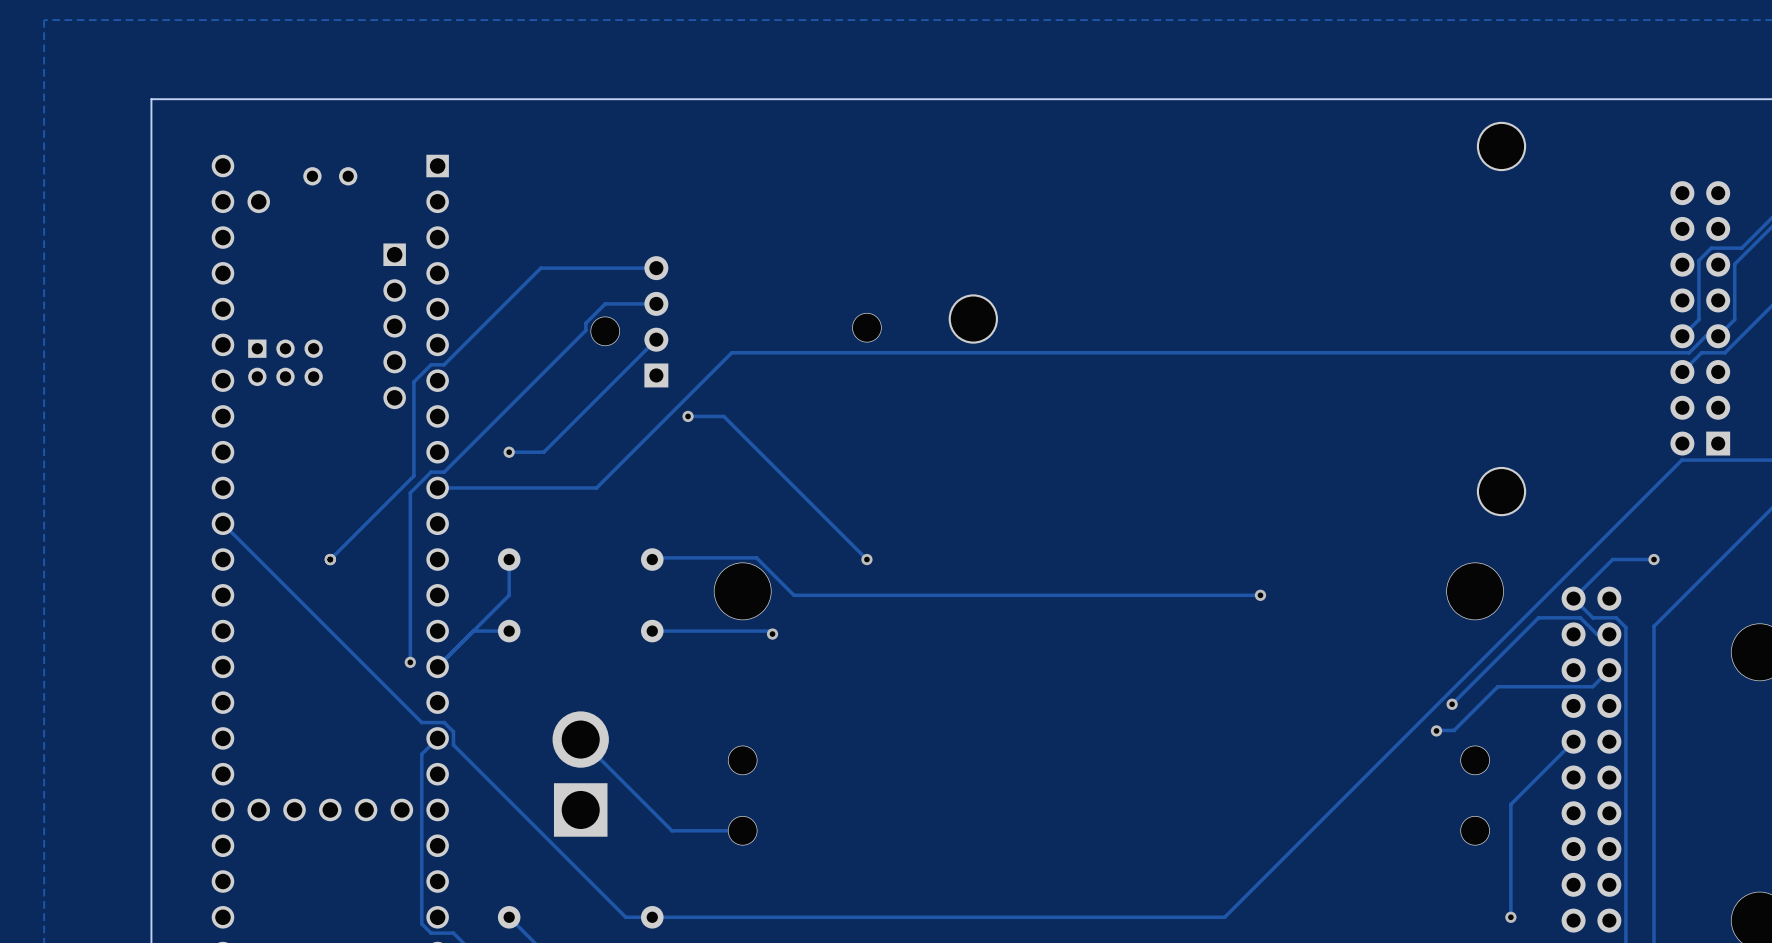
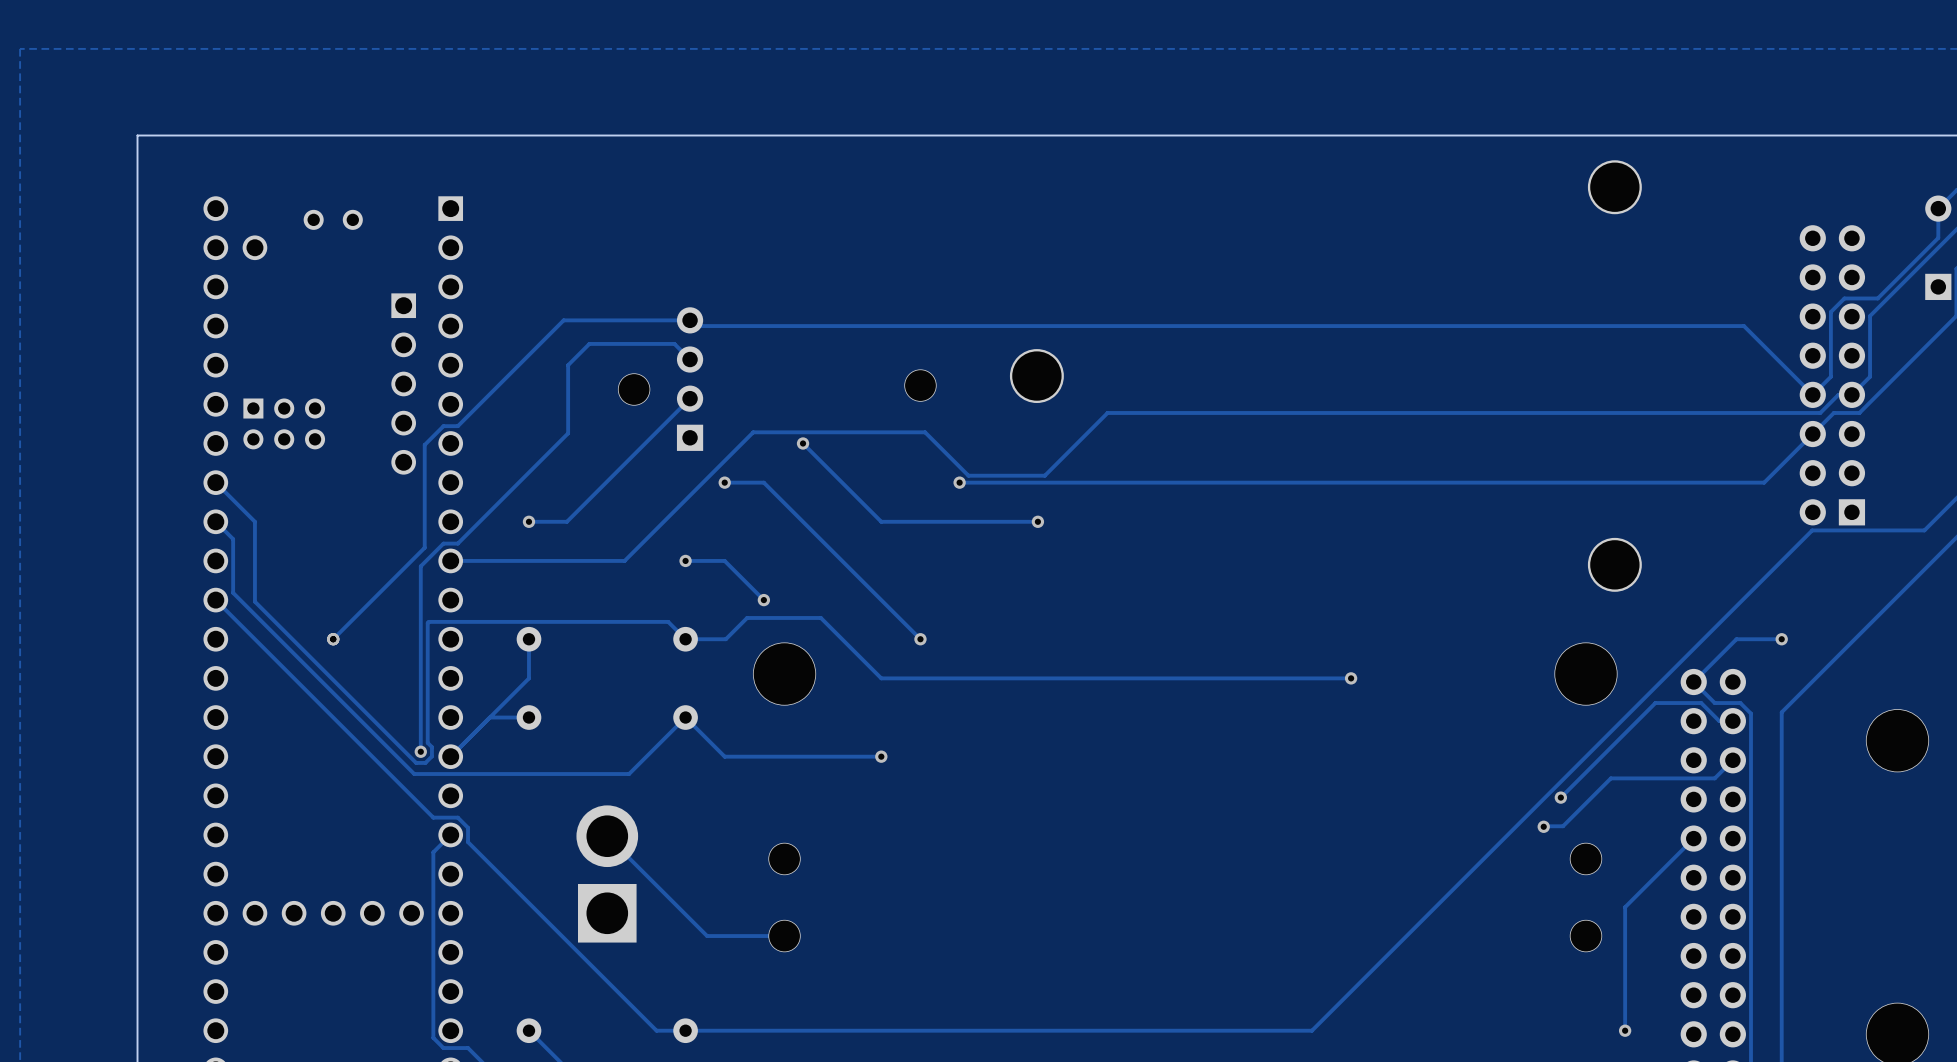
track: none -> (690, 320) (695, 326) (1743, 326) (1812, 394)
track: (656, 303) (605, 303) (585, 323) (585, 330) (544, 371) -> (690, 359) (674, 343) (589, 343) (568, 365) (568, 433)
track: (1037, 352) (731, 352) (714, 370) -> (1107, 412) (1044, 475) (968, 475) (925, 432) (753, 432)
track: none -> (1812, 434) (1764, 482) (959, 482)
track: none -> (803, 443) (881, 521) (1037, 521)
via: none -> (803, 443)
via: none -> (959, 482)
track: none -> (215, 521) (233, 539) (233, 592) (414, 774) (629, 774) (685, 717) (724, 756) (881, 756)
via: none -> (1037, 521)
track: none -> (685, 560) (724, 560) (763, 600)
via: none -> (685, 560)
via: none -> (763, 600)
track: (652, 559) (653, 557) (756, 557) (793, 595) (831, 595) -> (215, 482) (254, 521) (254, 601) (416, 762) (425, 762) (431, 756) (431, 747) (427, 742) (428, 621) (668, 621) (685, 639) (725, 639) (747, 617) (820, 617) (881, 678)
track: (652, 631) (769, 631) (772, 634) -> none
via: (772, 634) -> none
via: none -> (881, 756)

